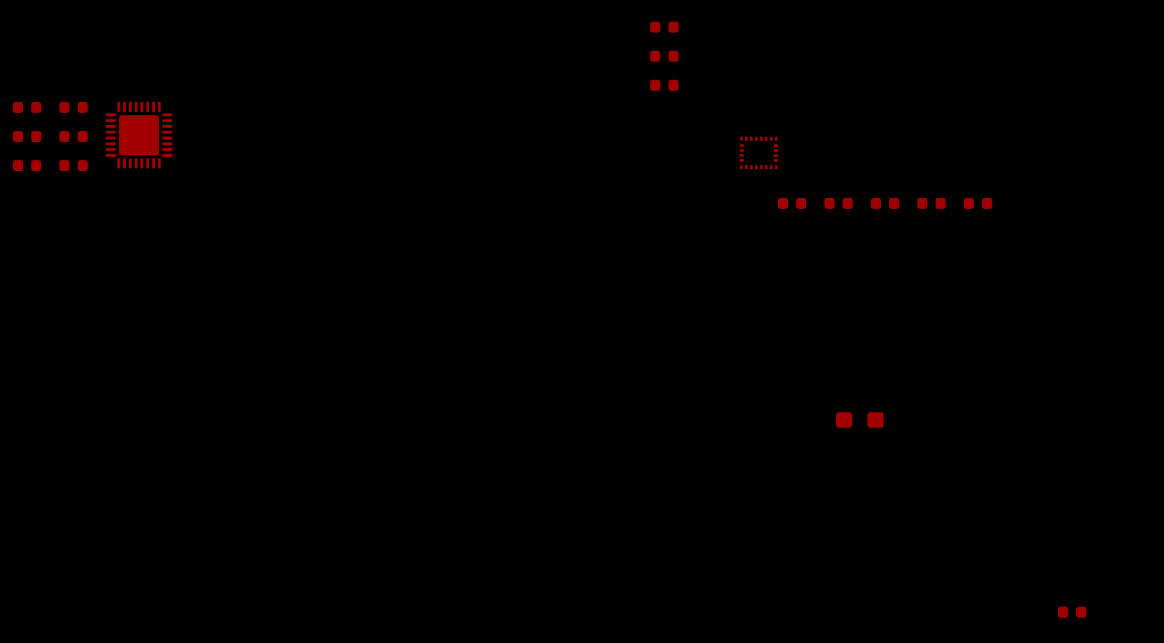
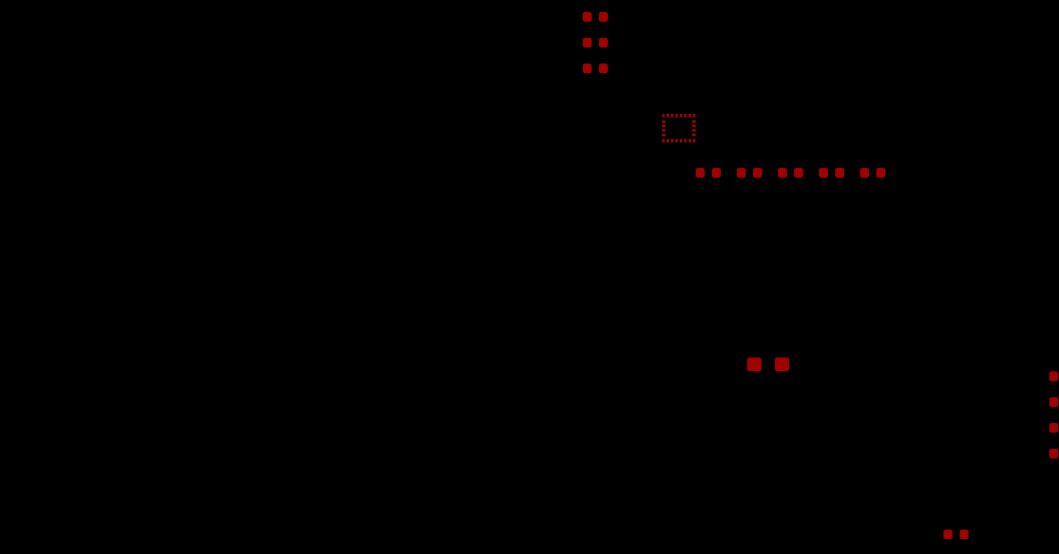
part: (27, 107) -> none
part: (73, 107) -> none
part: (139, 135) -> none
part: (27, 136) -> none
part: (73, 136) -> none
part: (27, 165) -> none
part: (73, 165) -> none

